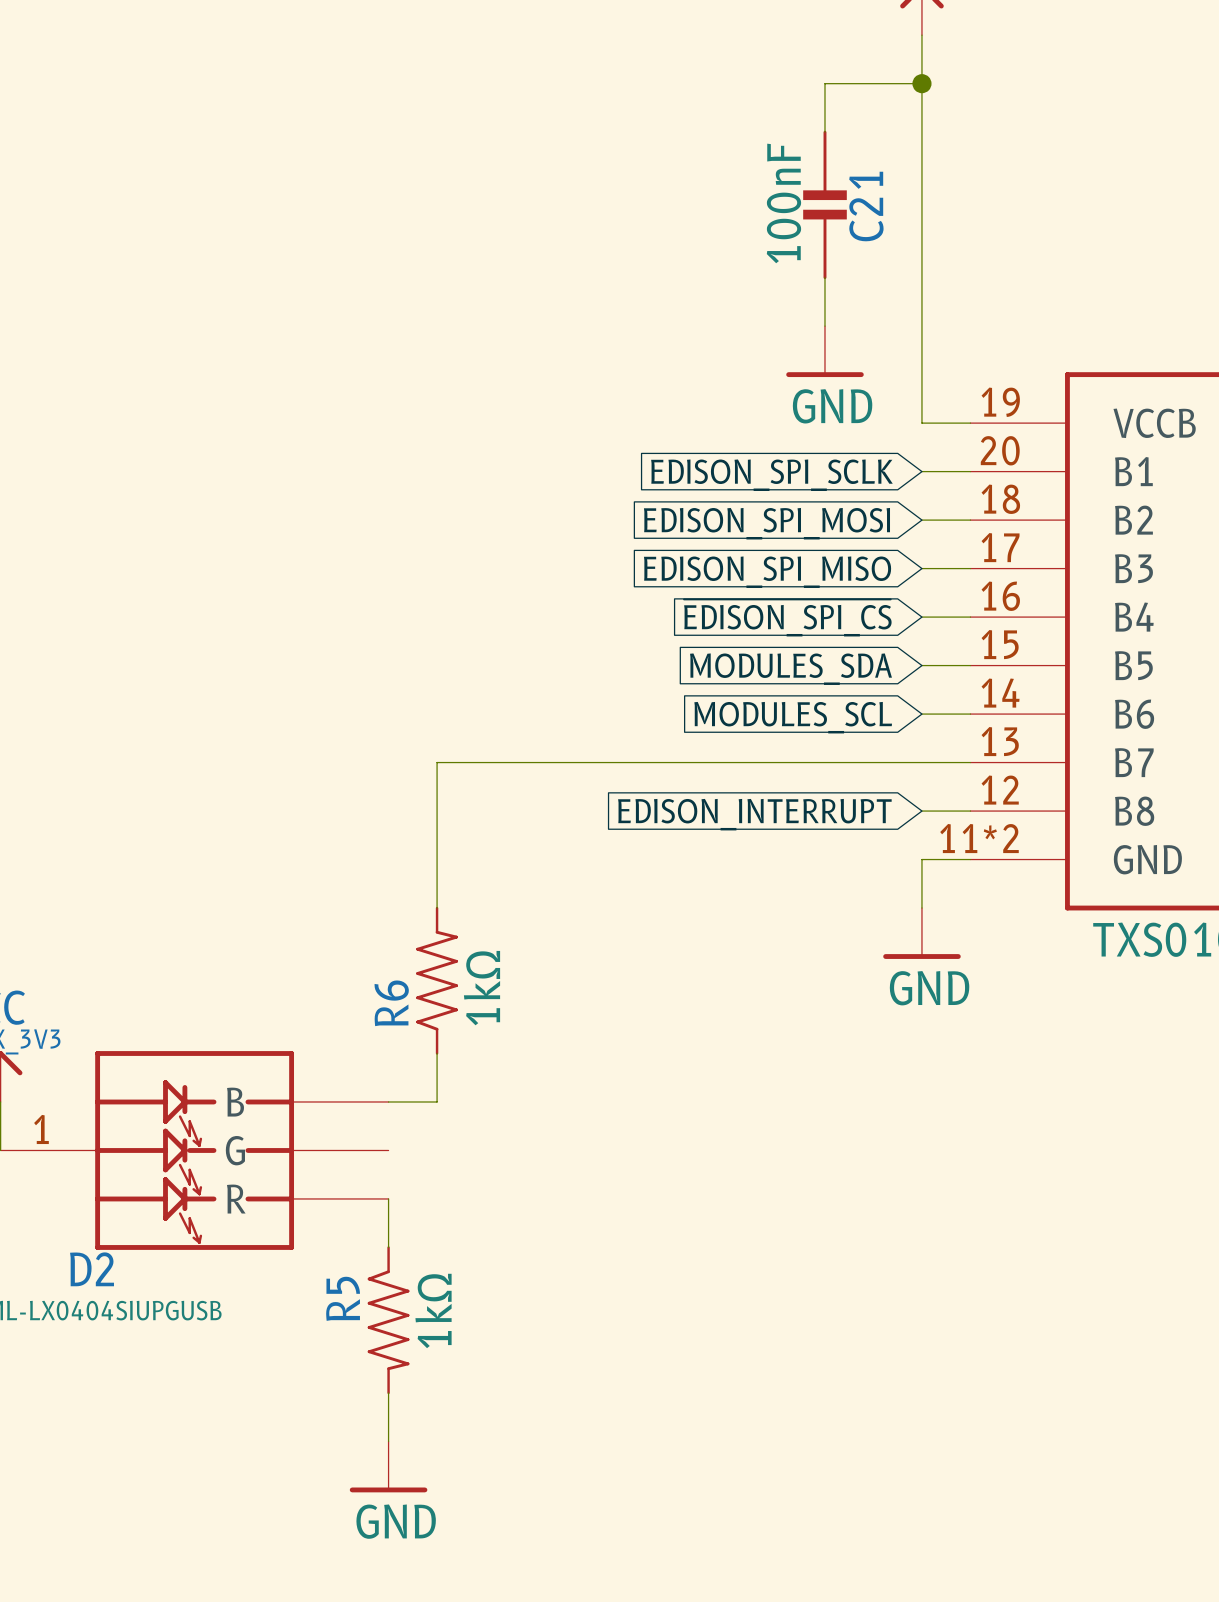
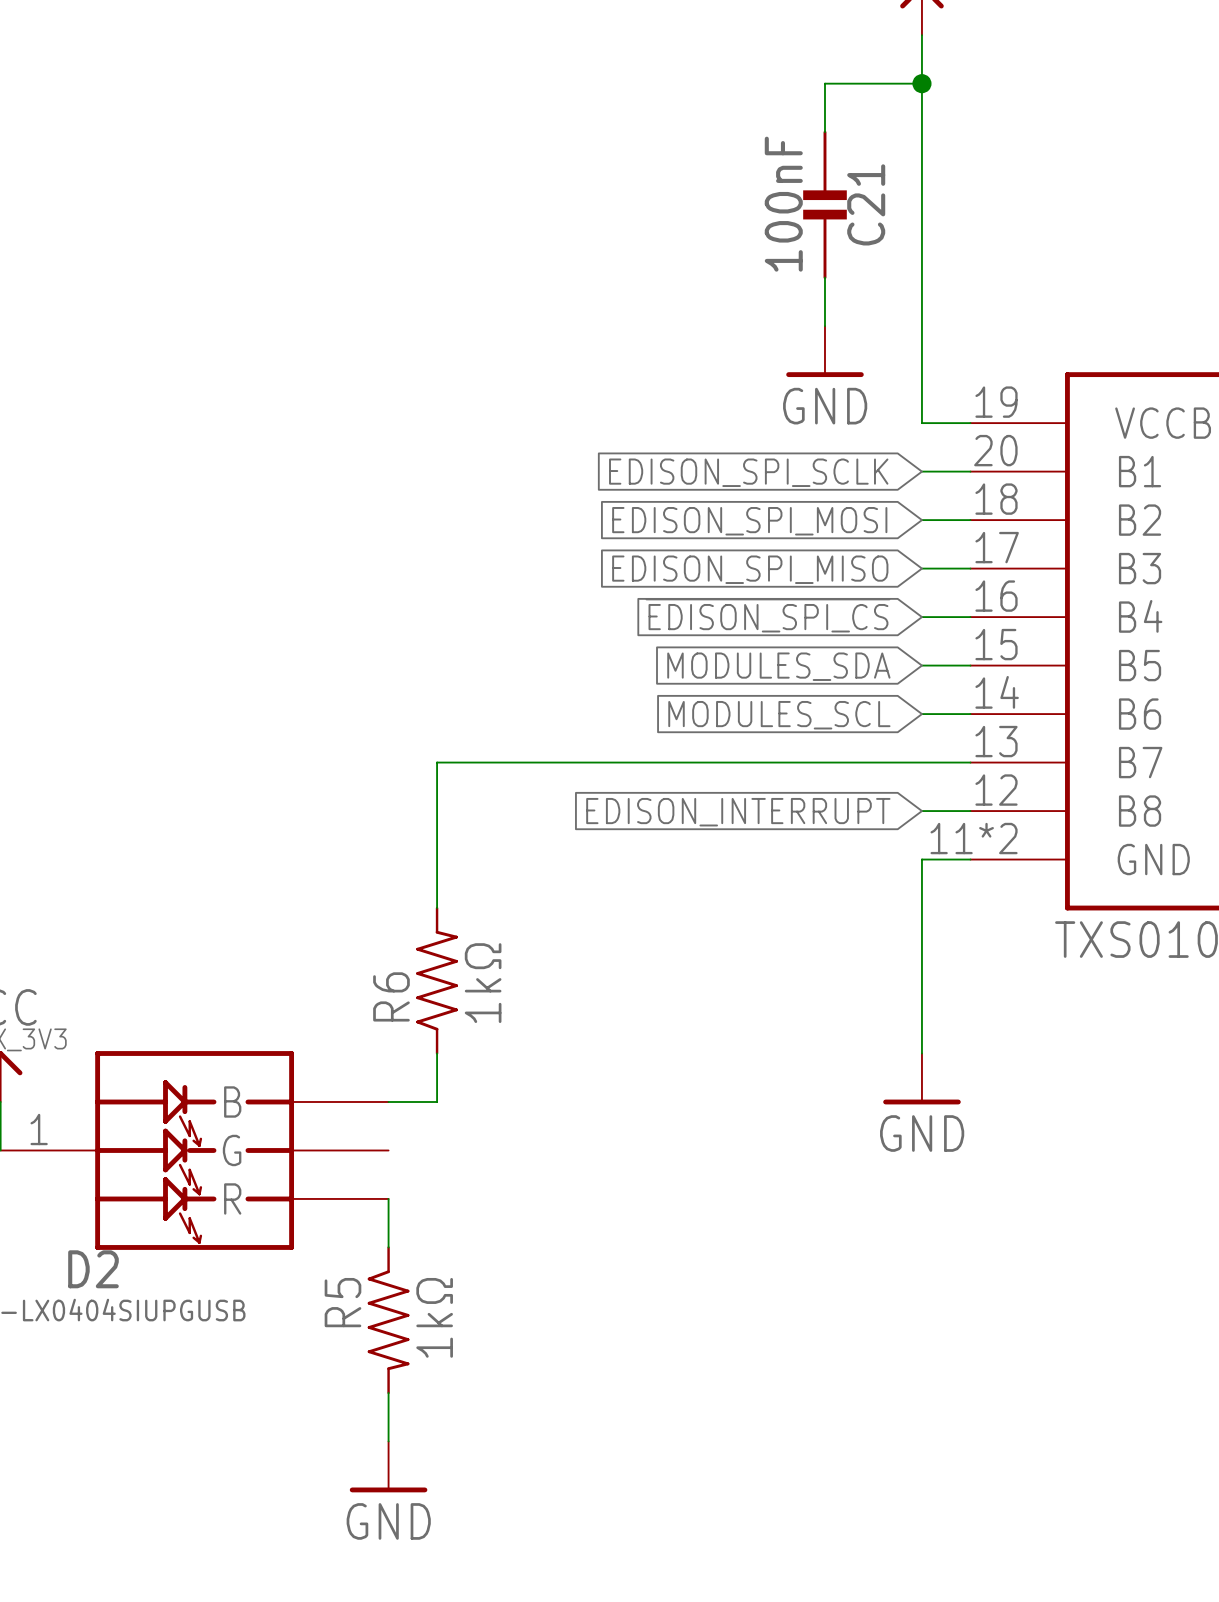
wire: none -> (921, 908) (921, 1053)
power symbol position: GND (921, 933) -> GND (921, 1078)

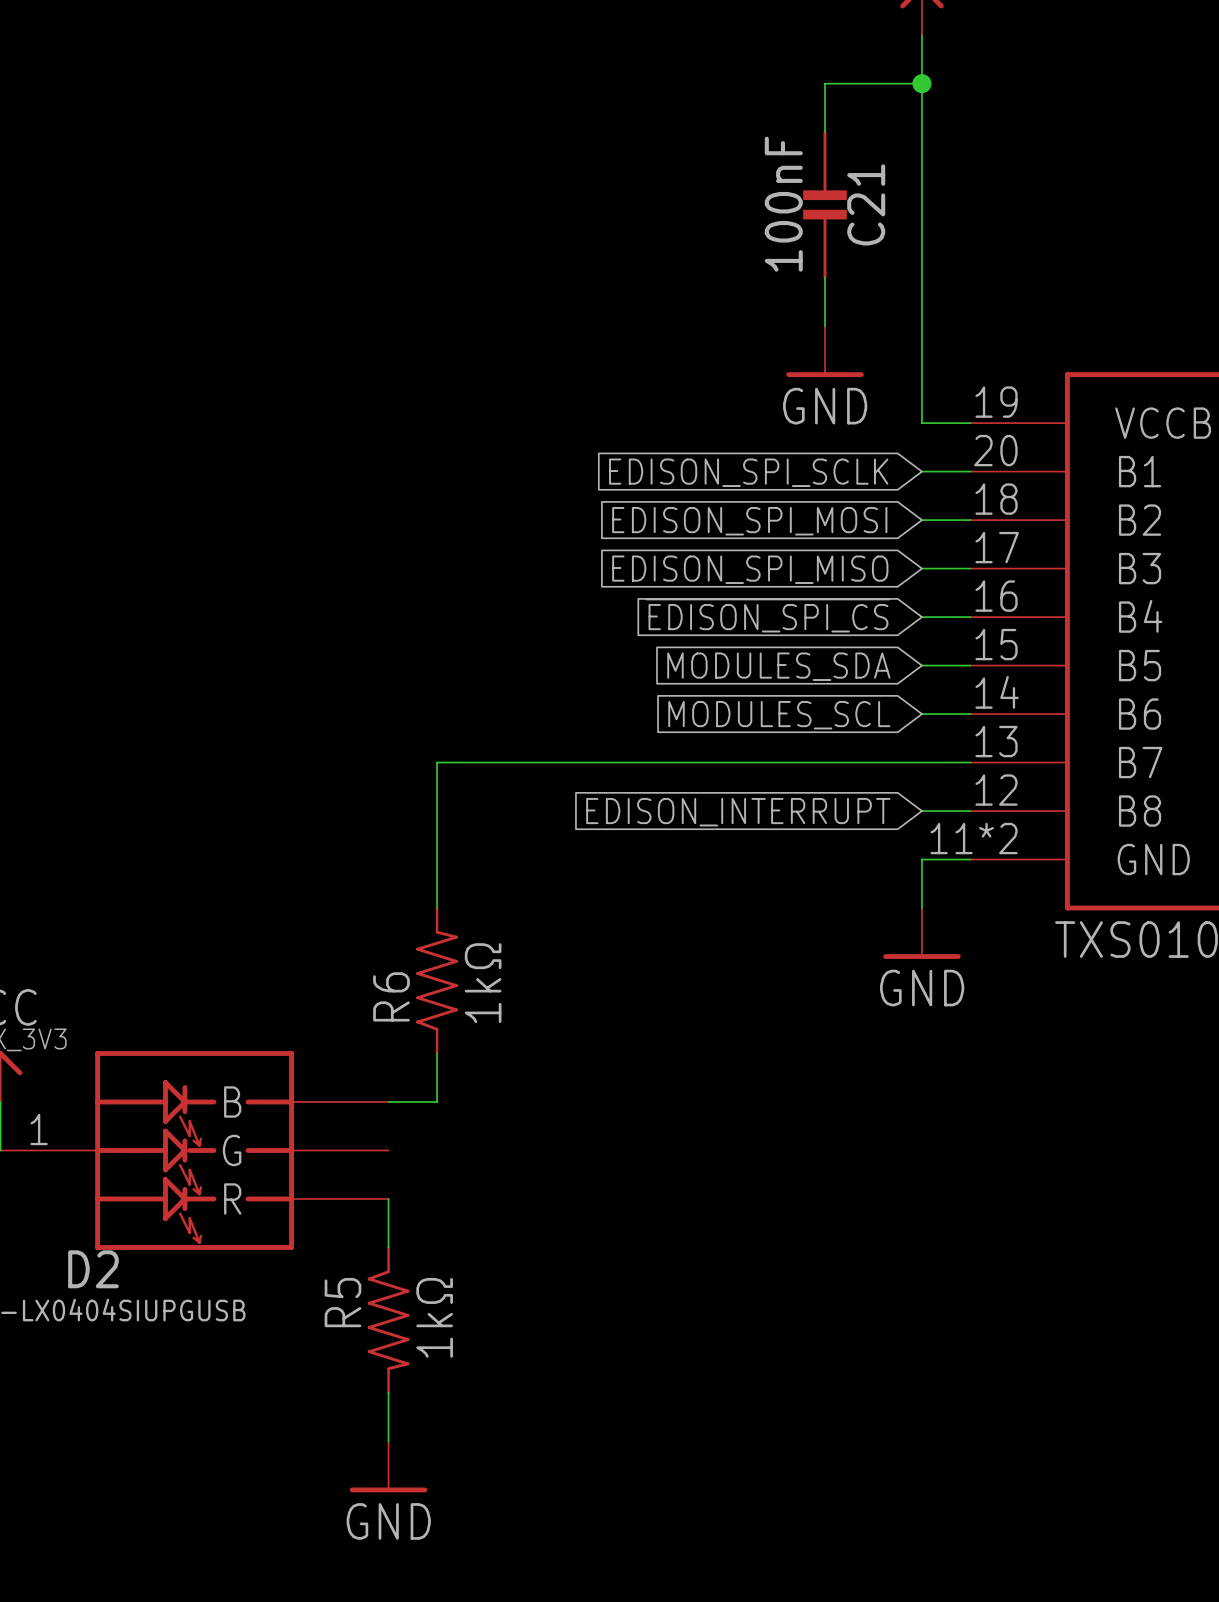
wire: (921, 908) (921, 1053) -> none
power symbol position: GND (921, 1078) -> GND (921, 933)

